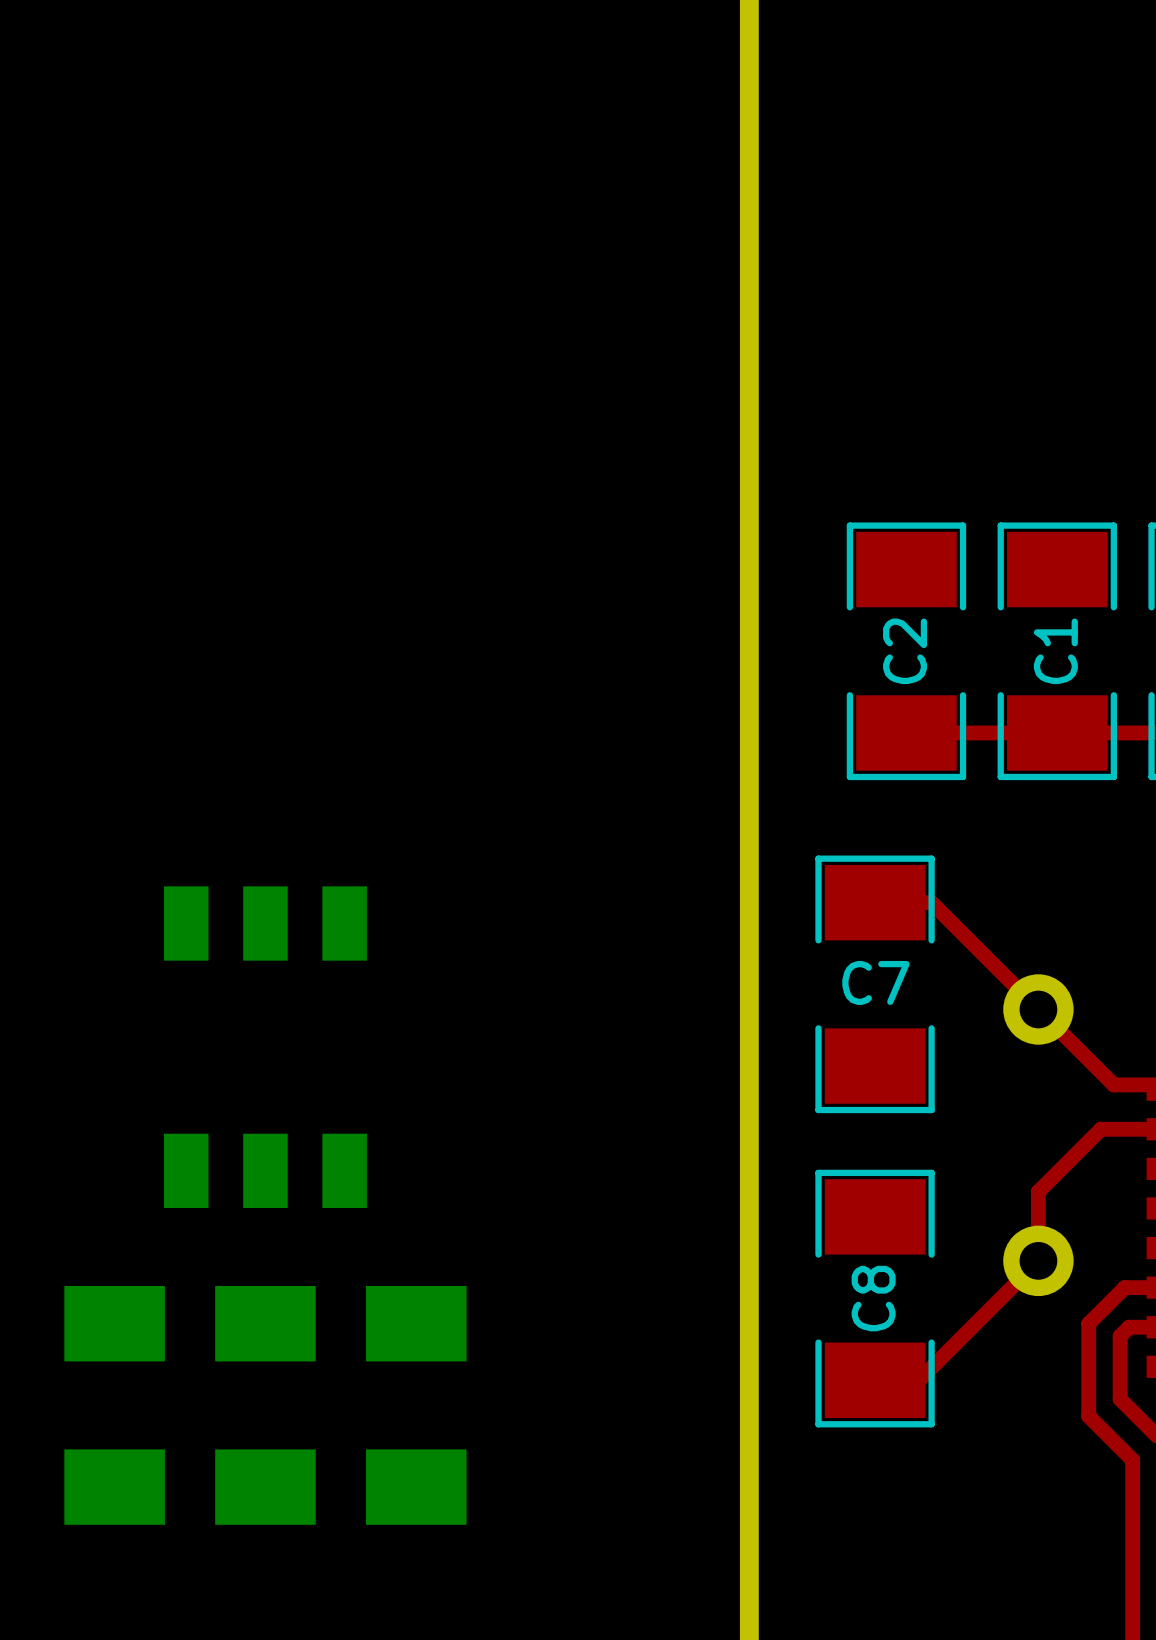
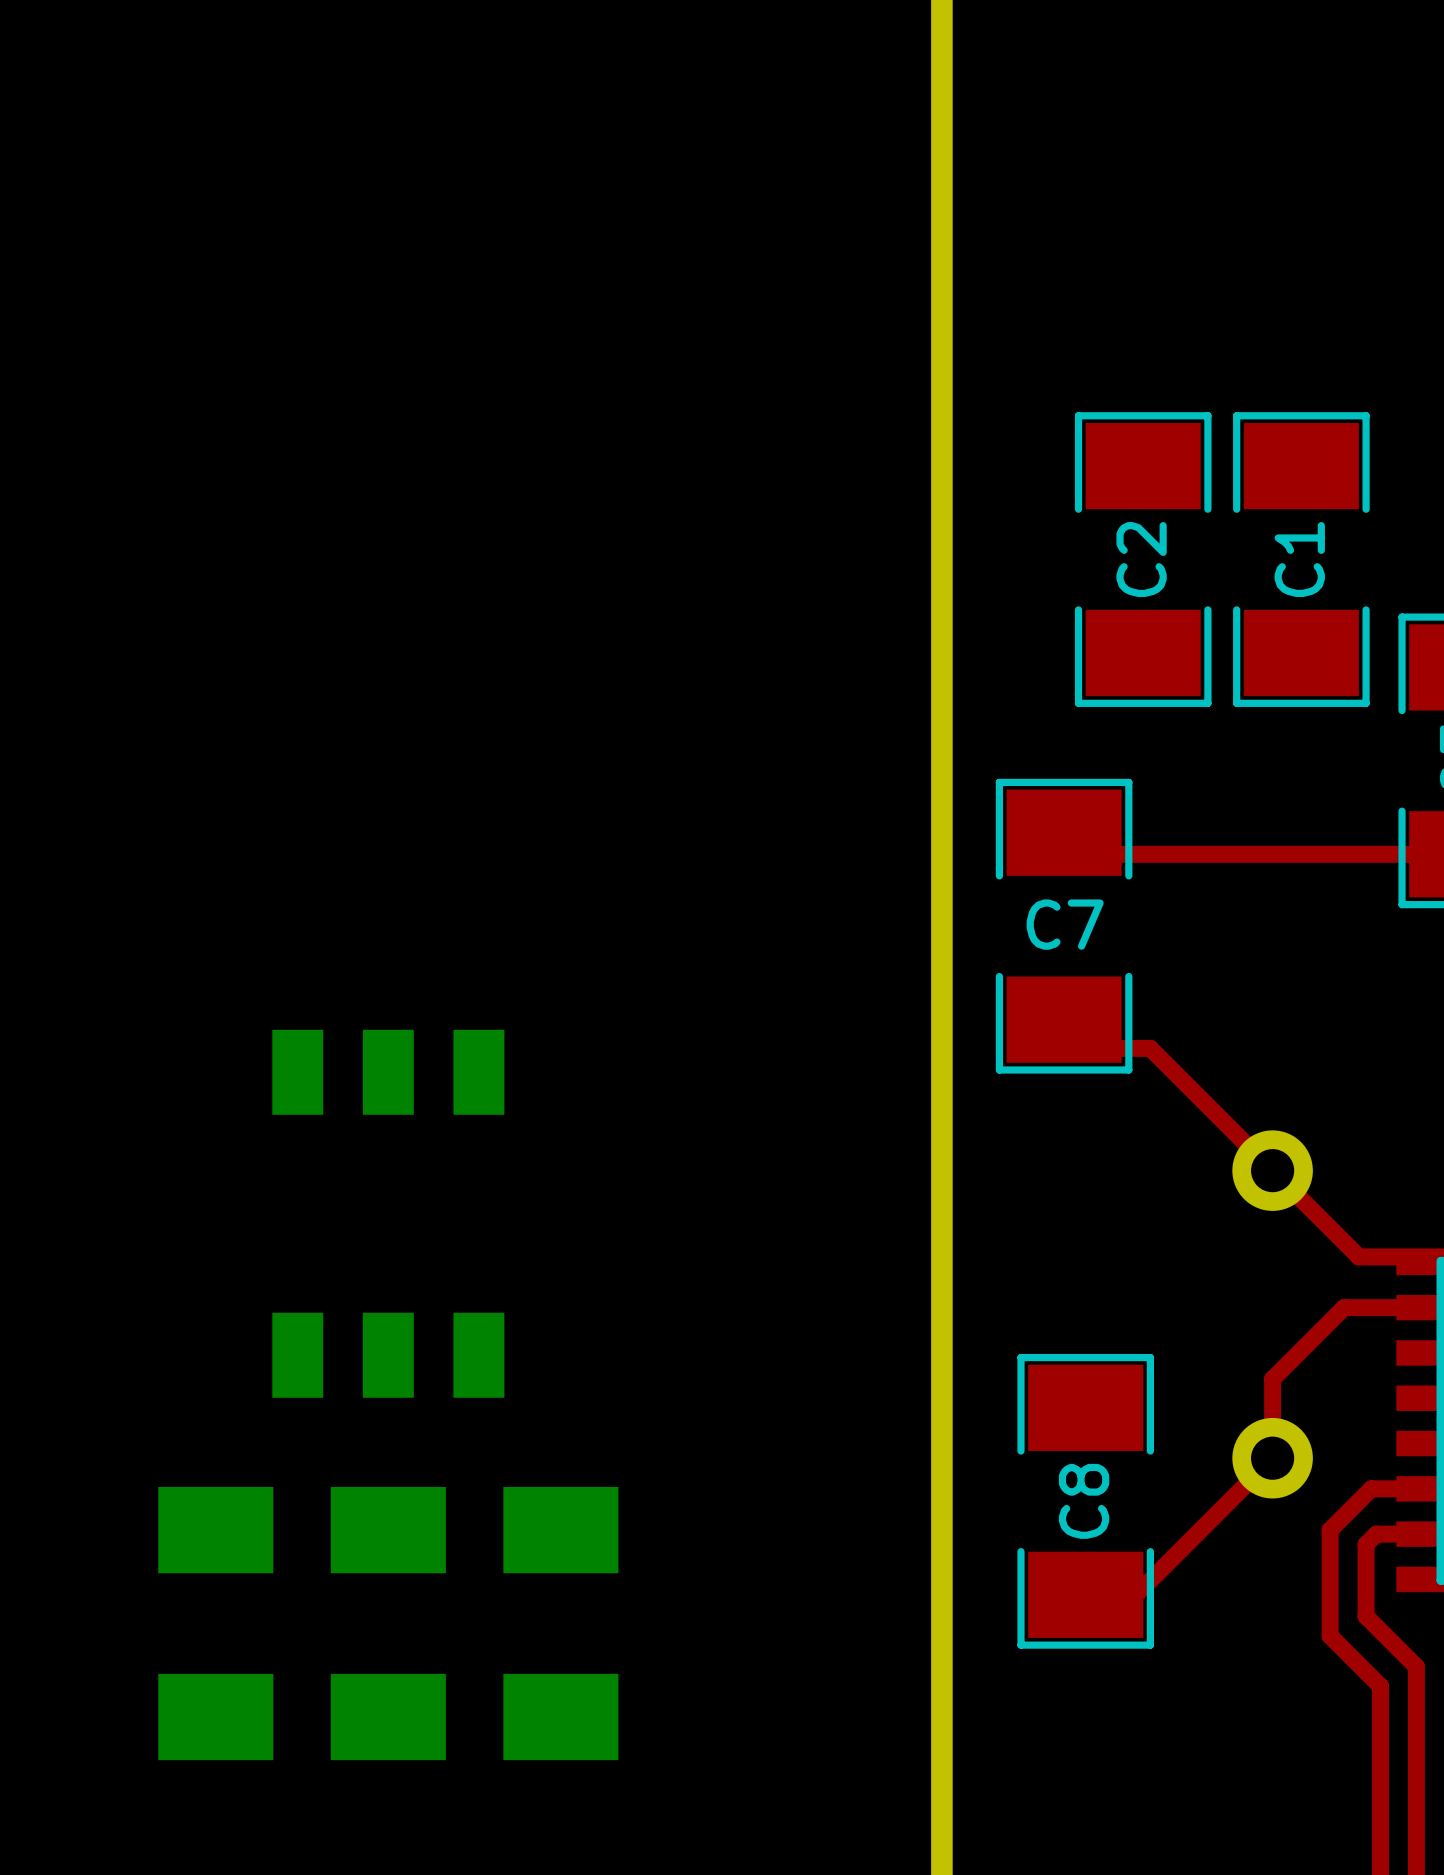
C2 position: (906, 651) -> (1143, 559)
C1 position: (1057, 651) -> (1301, 559)
C7 position: (875, 984) -> (1064, 926)

